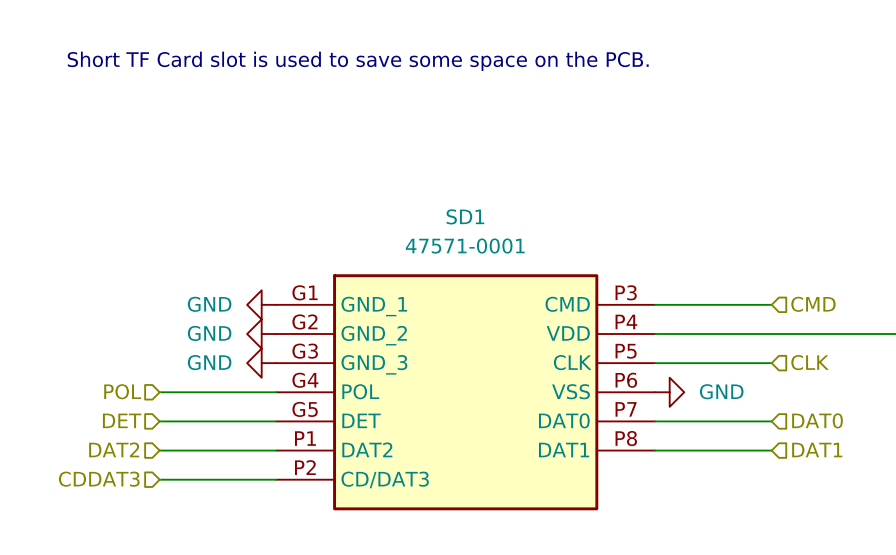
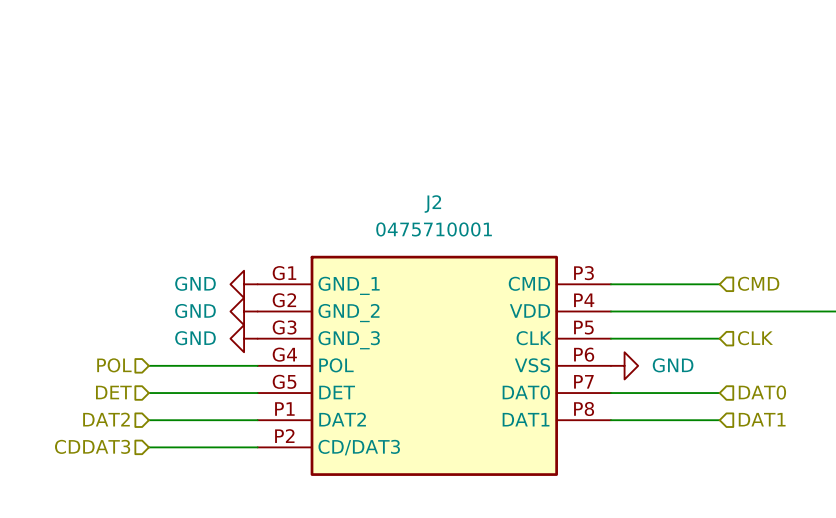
text: Short TF Card slot is used to save some space on the PCB. (358, 61) -> none
SD1 name: SD1 (465, 216) -> J2 (432, 204)
SD1 value: 47571-0001 (465, 246) -> 0475710001 (434, 229)

